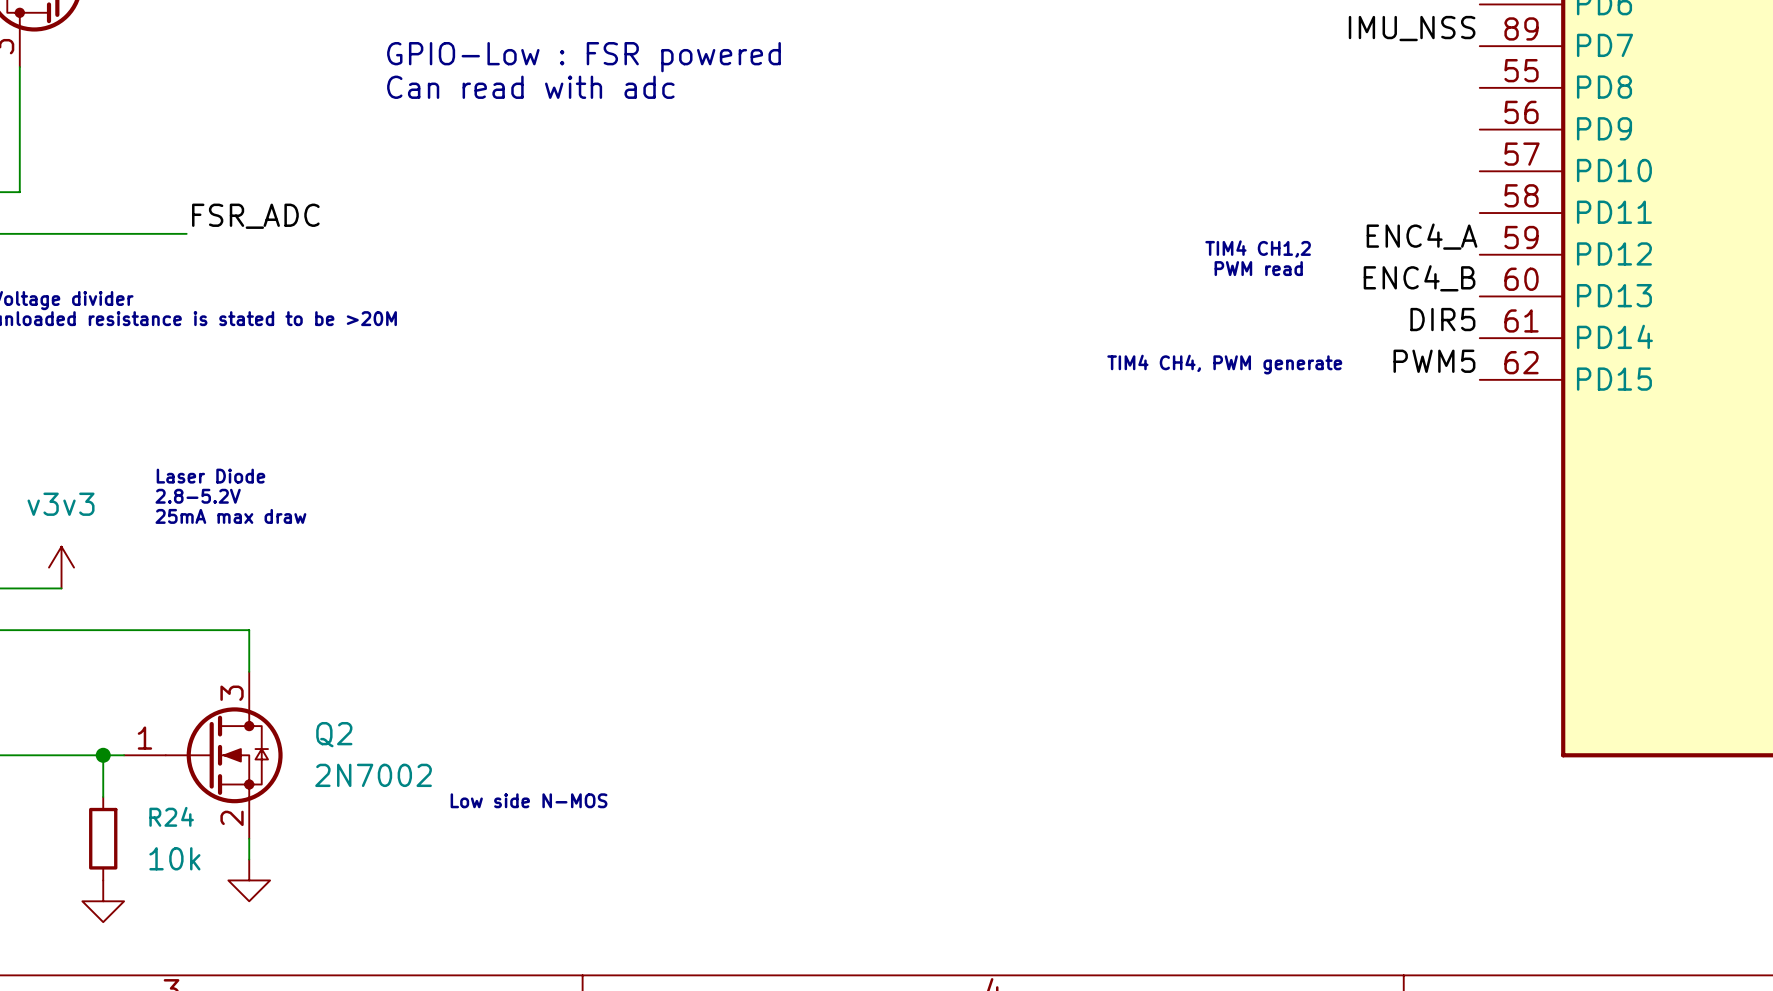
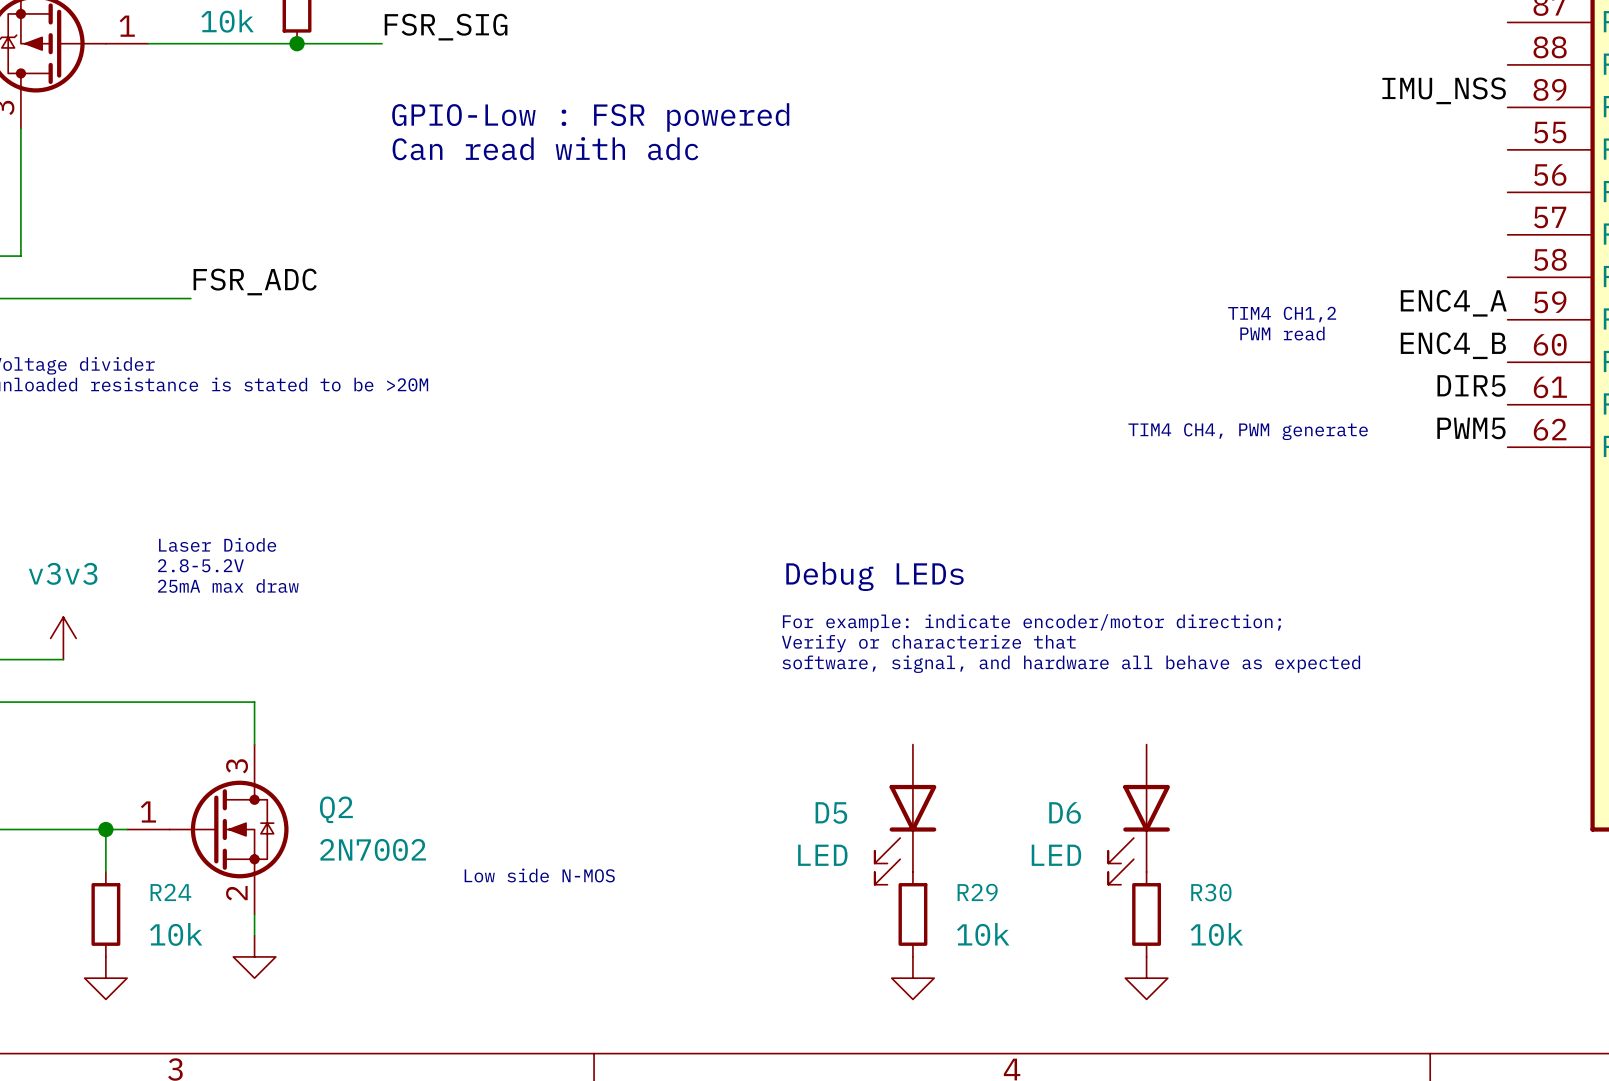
text: none -> Debug LEDs (875, 576)
text: none -> For example: indicate encoder/motor direction; (1032, 622)
text: none -> Verify or characterize that (928, 643)
text: none -> software, signal, and hardware all behave as expected (1071, 664)
D5: none -> LED (905, 814)
D6: none -> LED (1139, 814)
R29: none -> 10k (912, 914)
R30: none -> 10k (1146, 914)
power symbol: none -> (912, 978)
power symbol: none -> (1146, 978)

